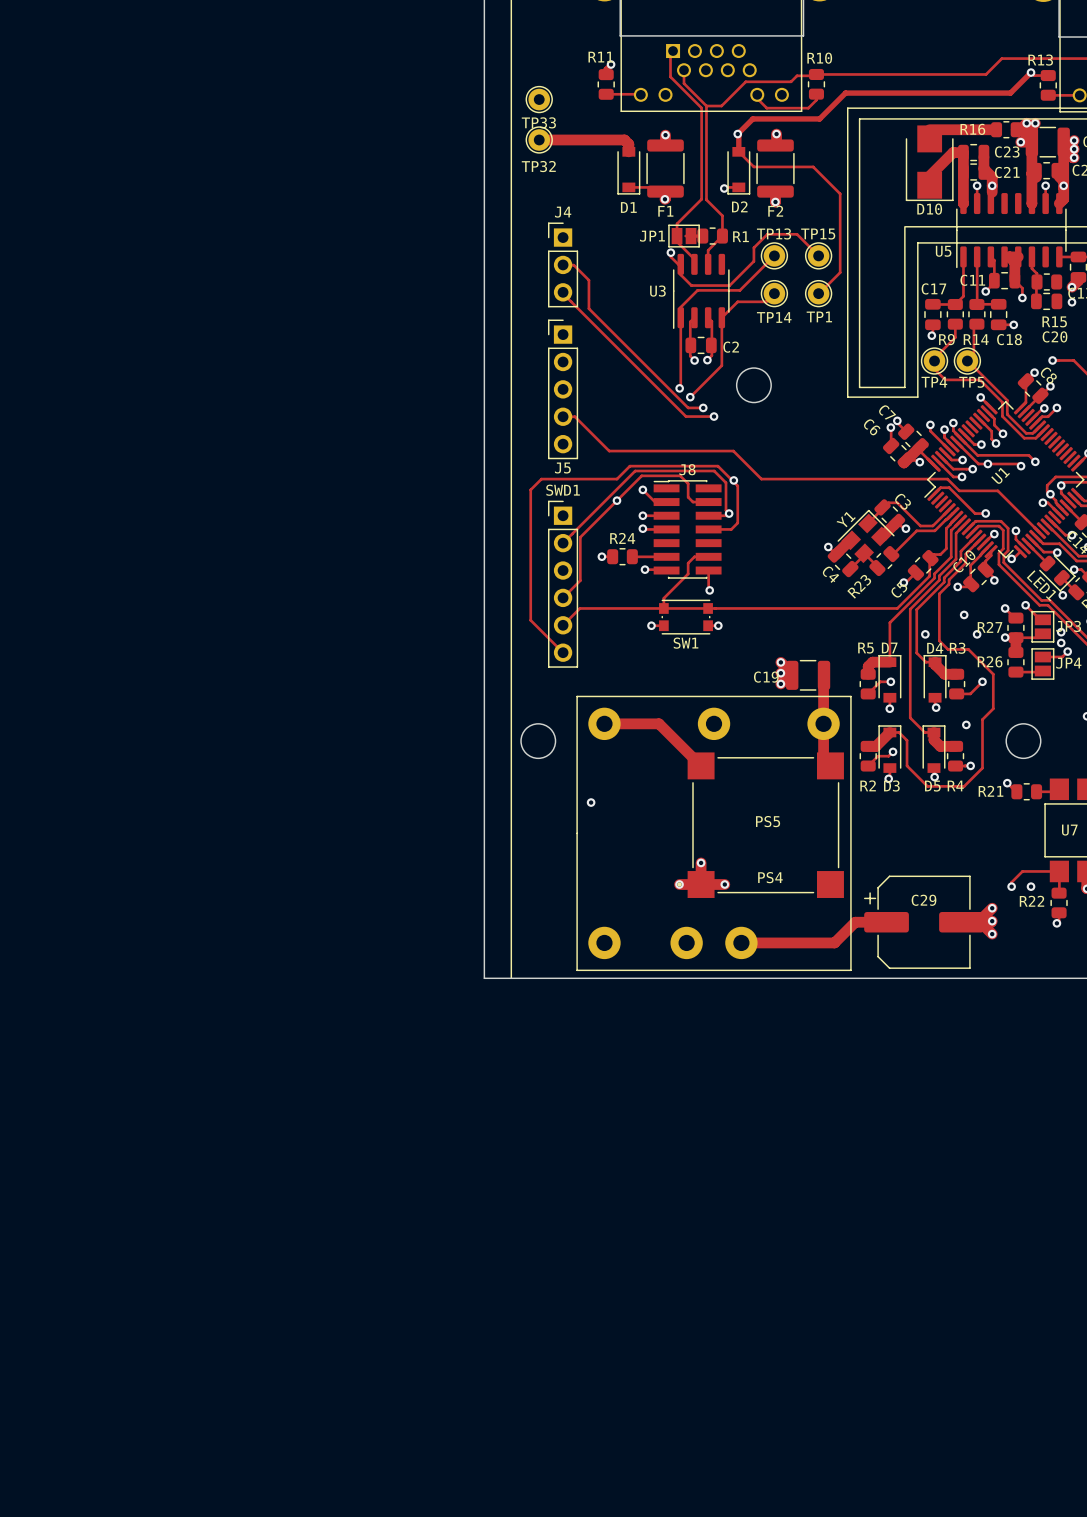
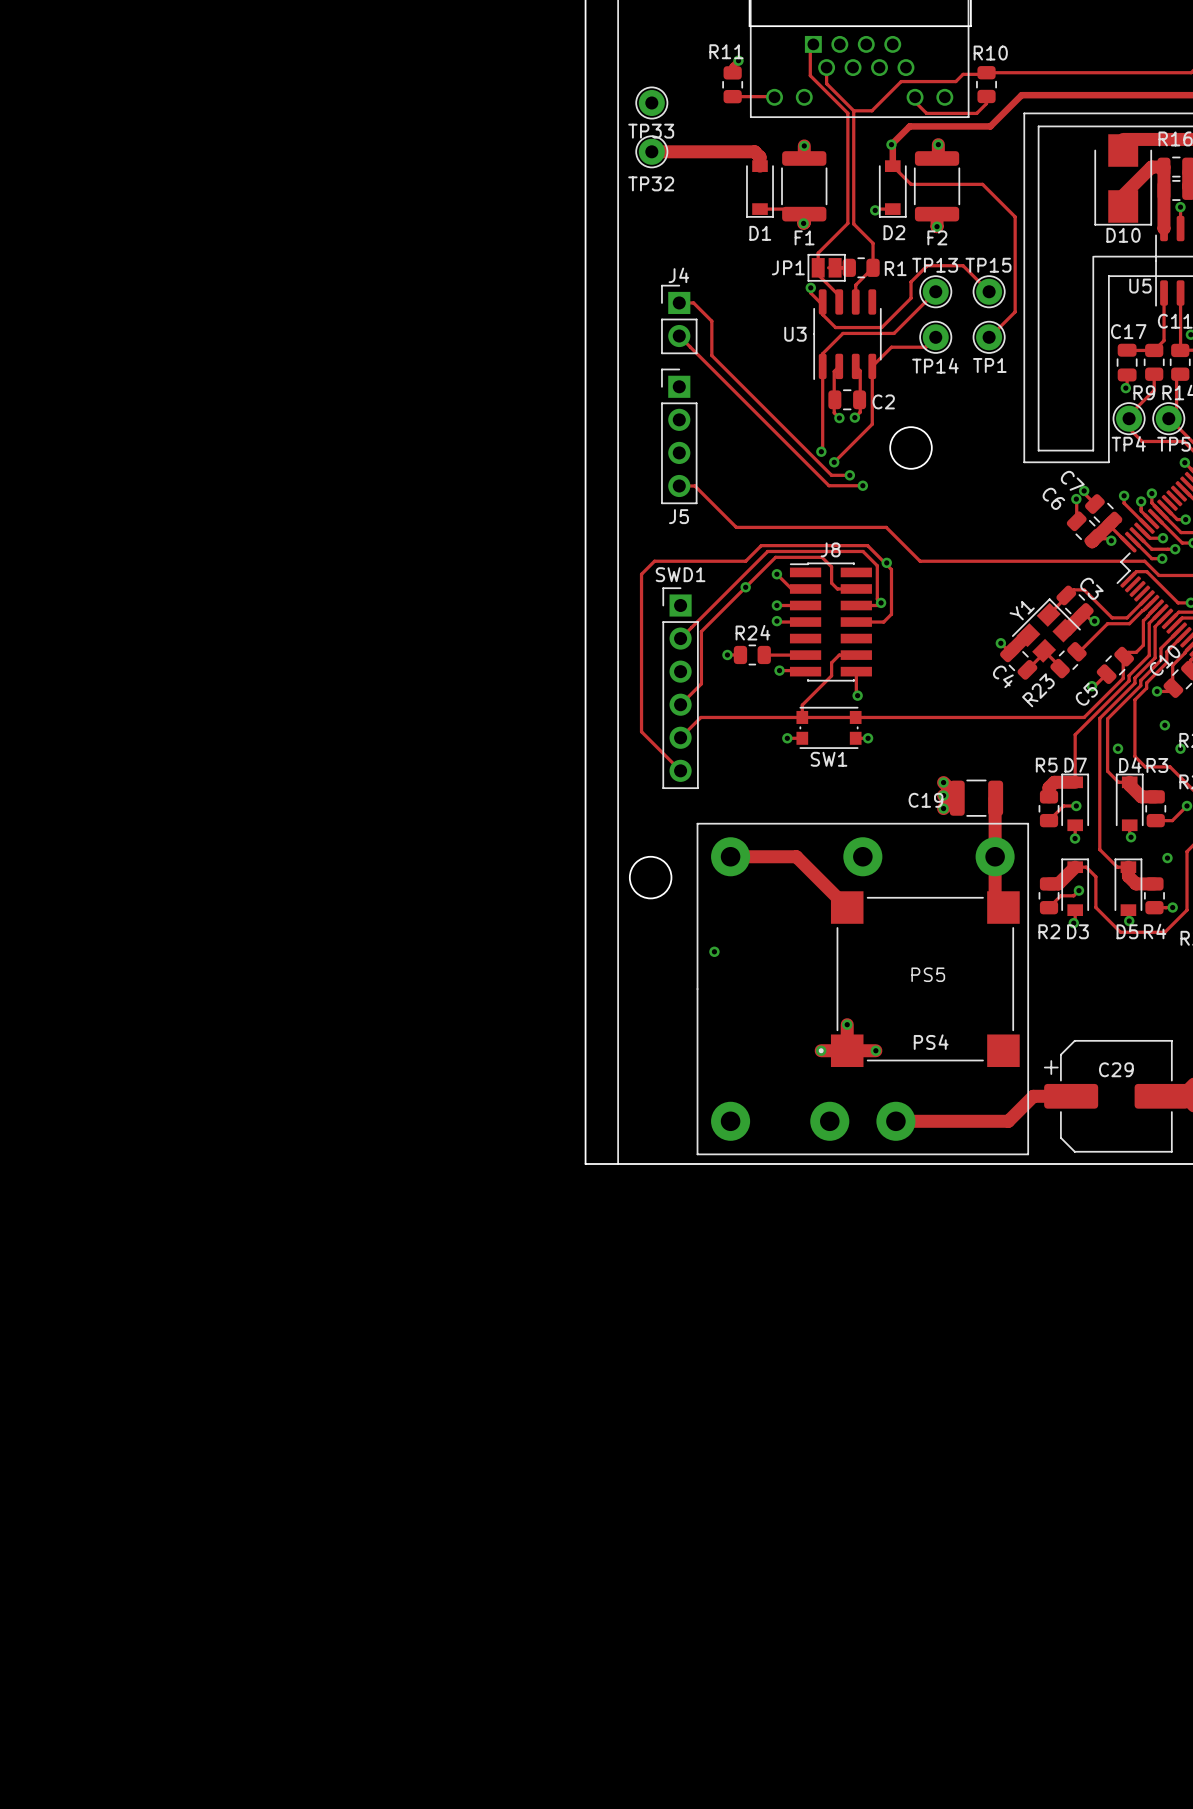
J4 footprint: [548, 222, 579, 308] -> [661, 284, 698, 355]
J5 footprint: [548, 319, 579, 460] -> [661, 368, 698, 505]

